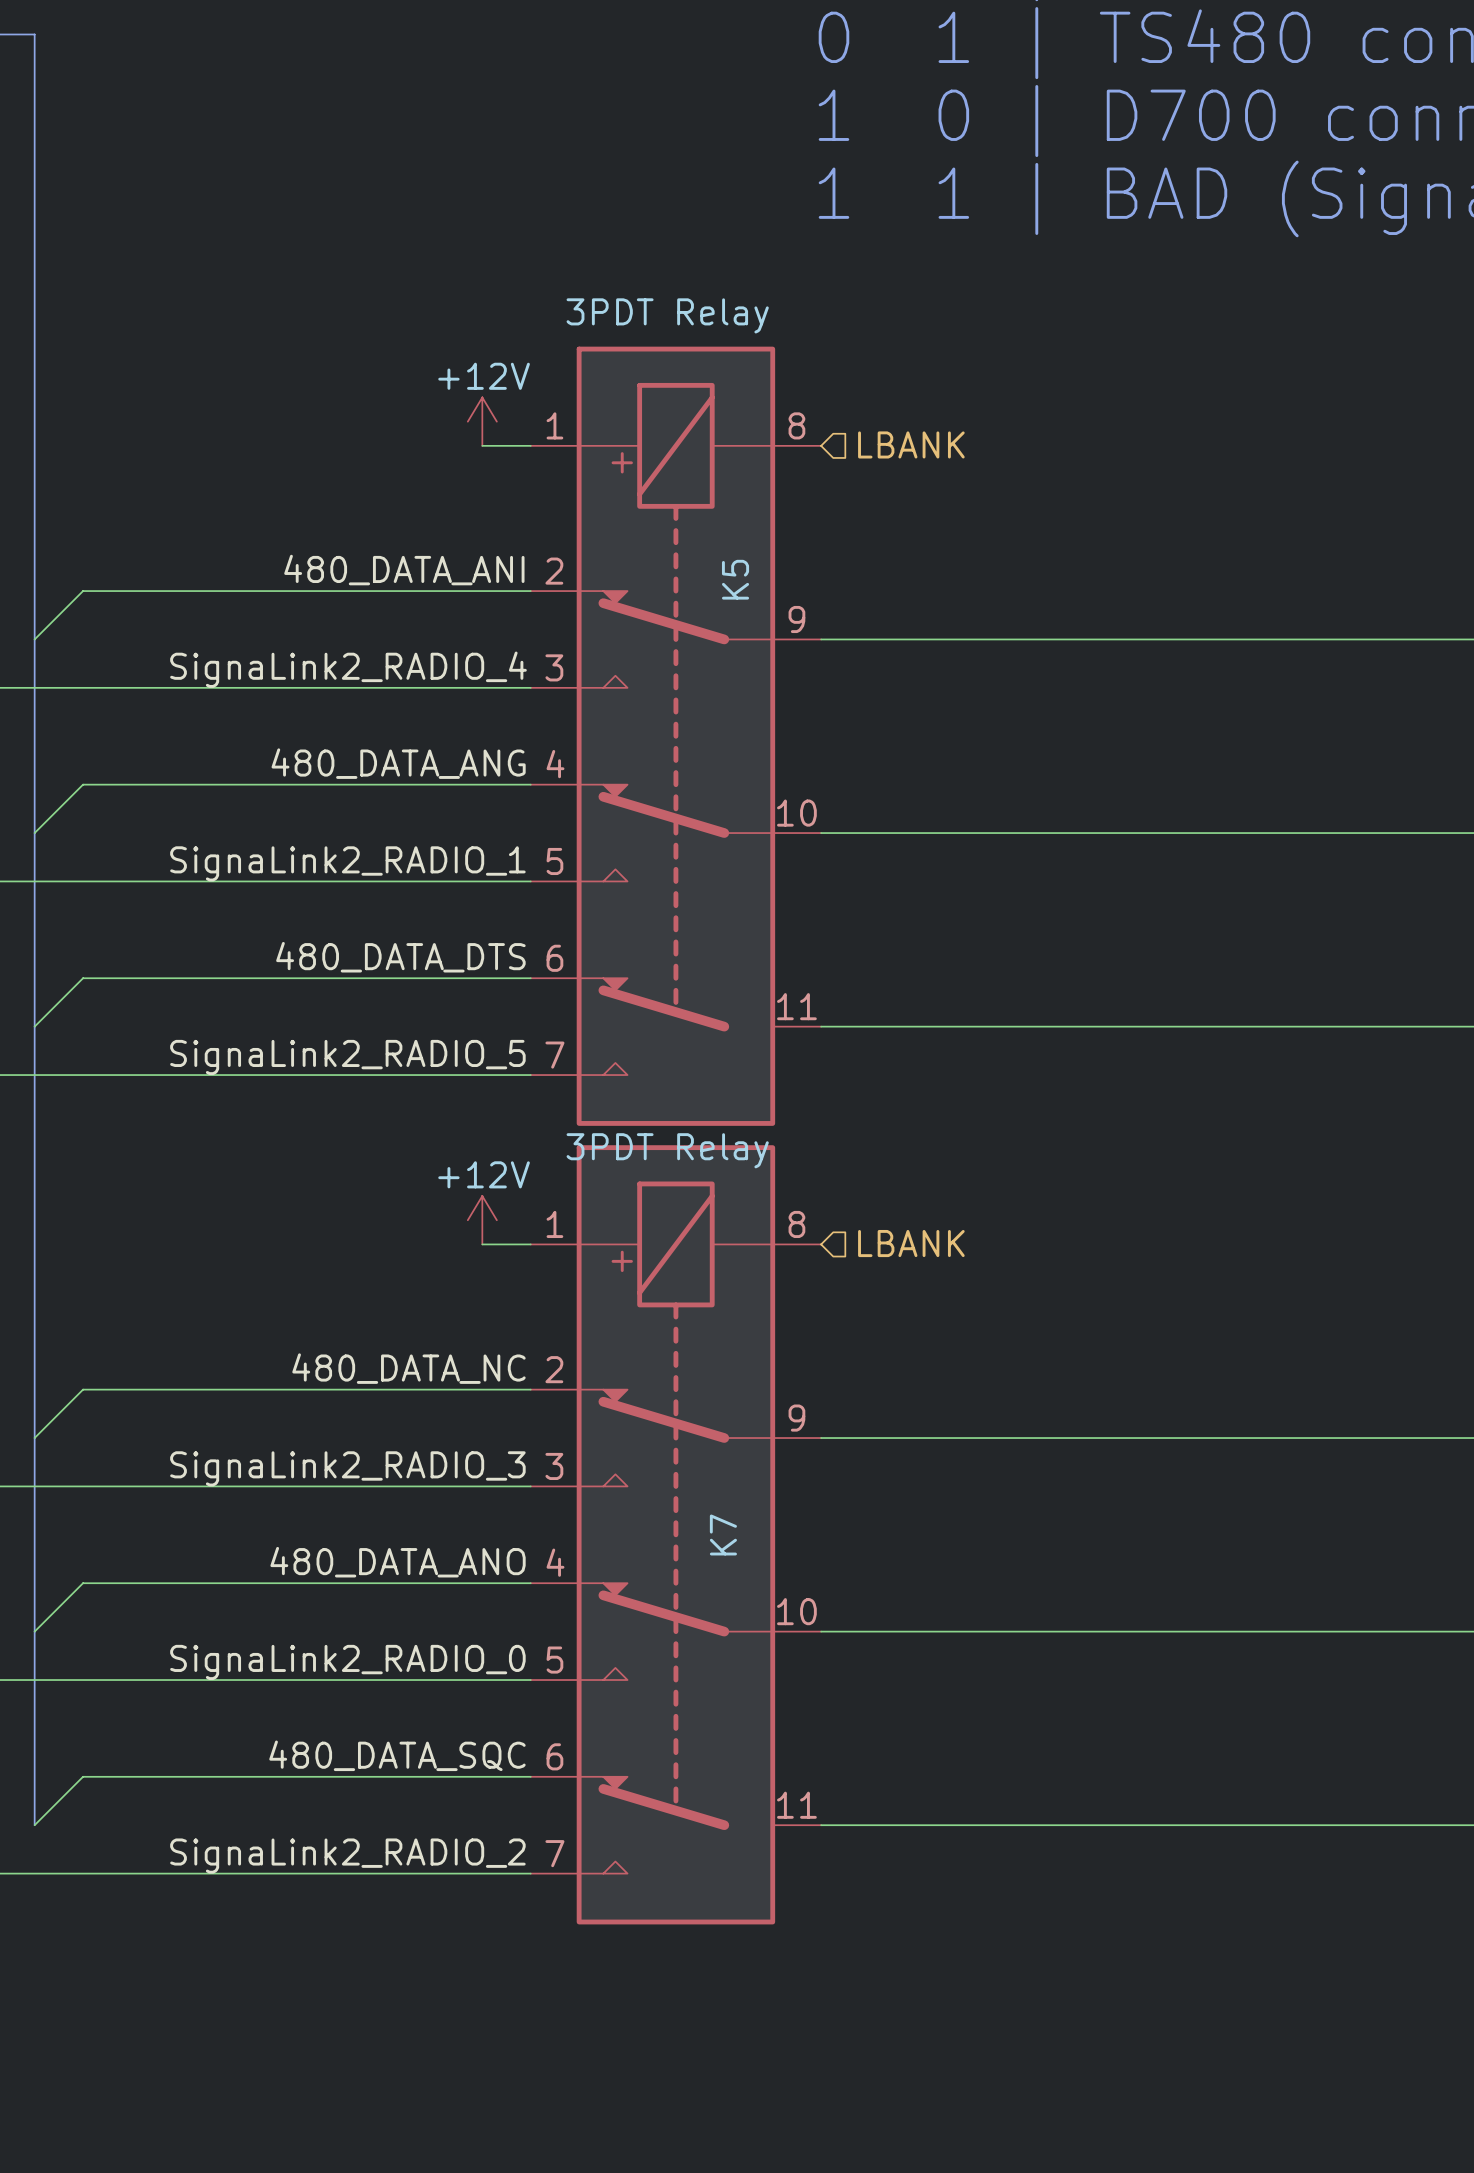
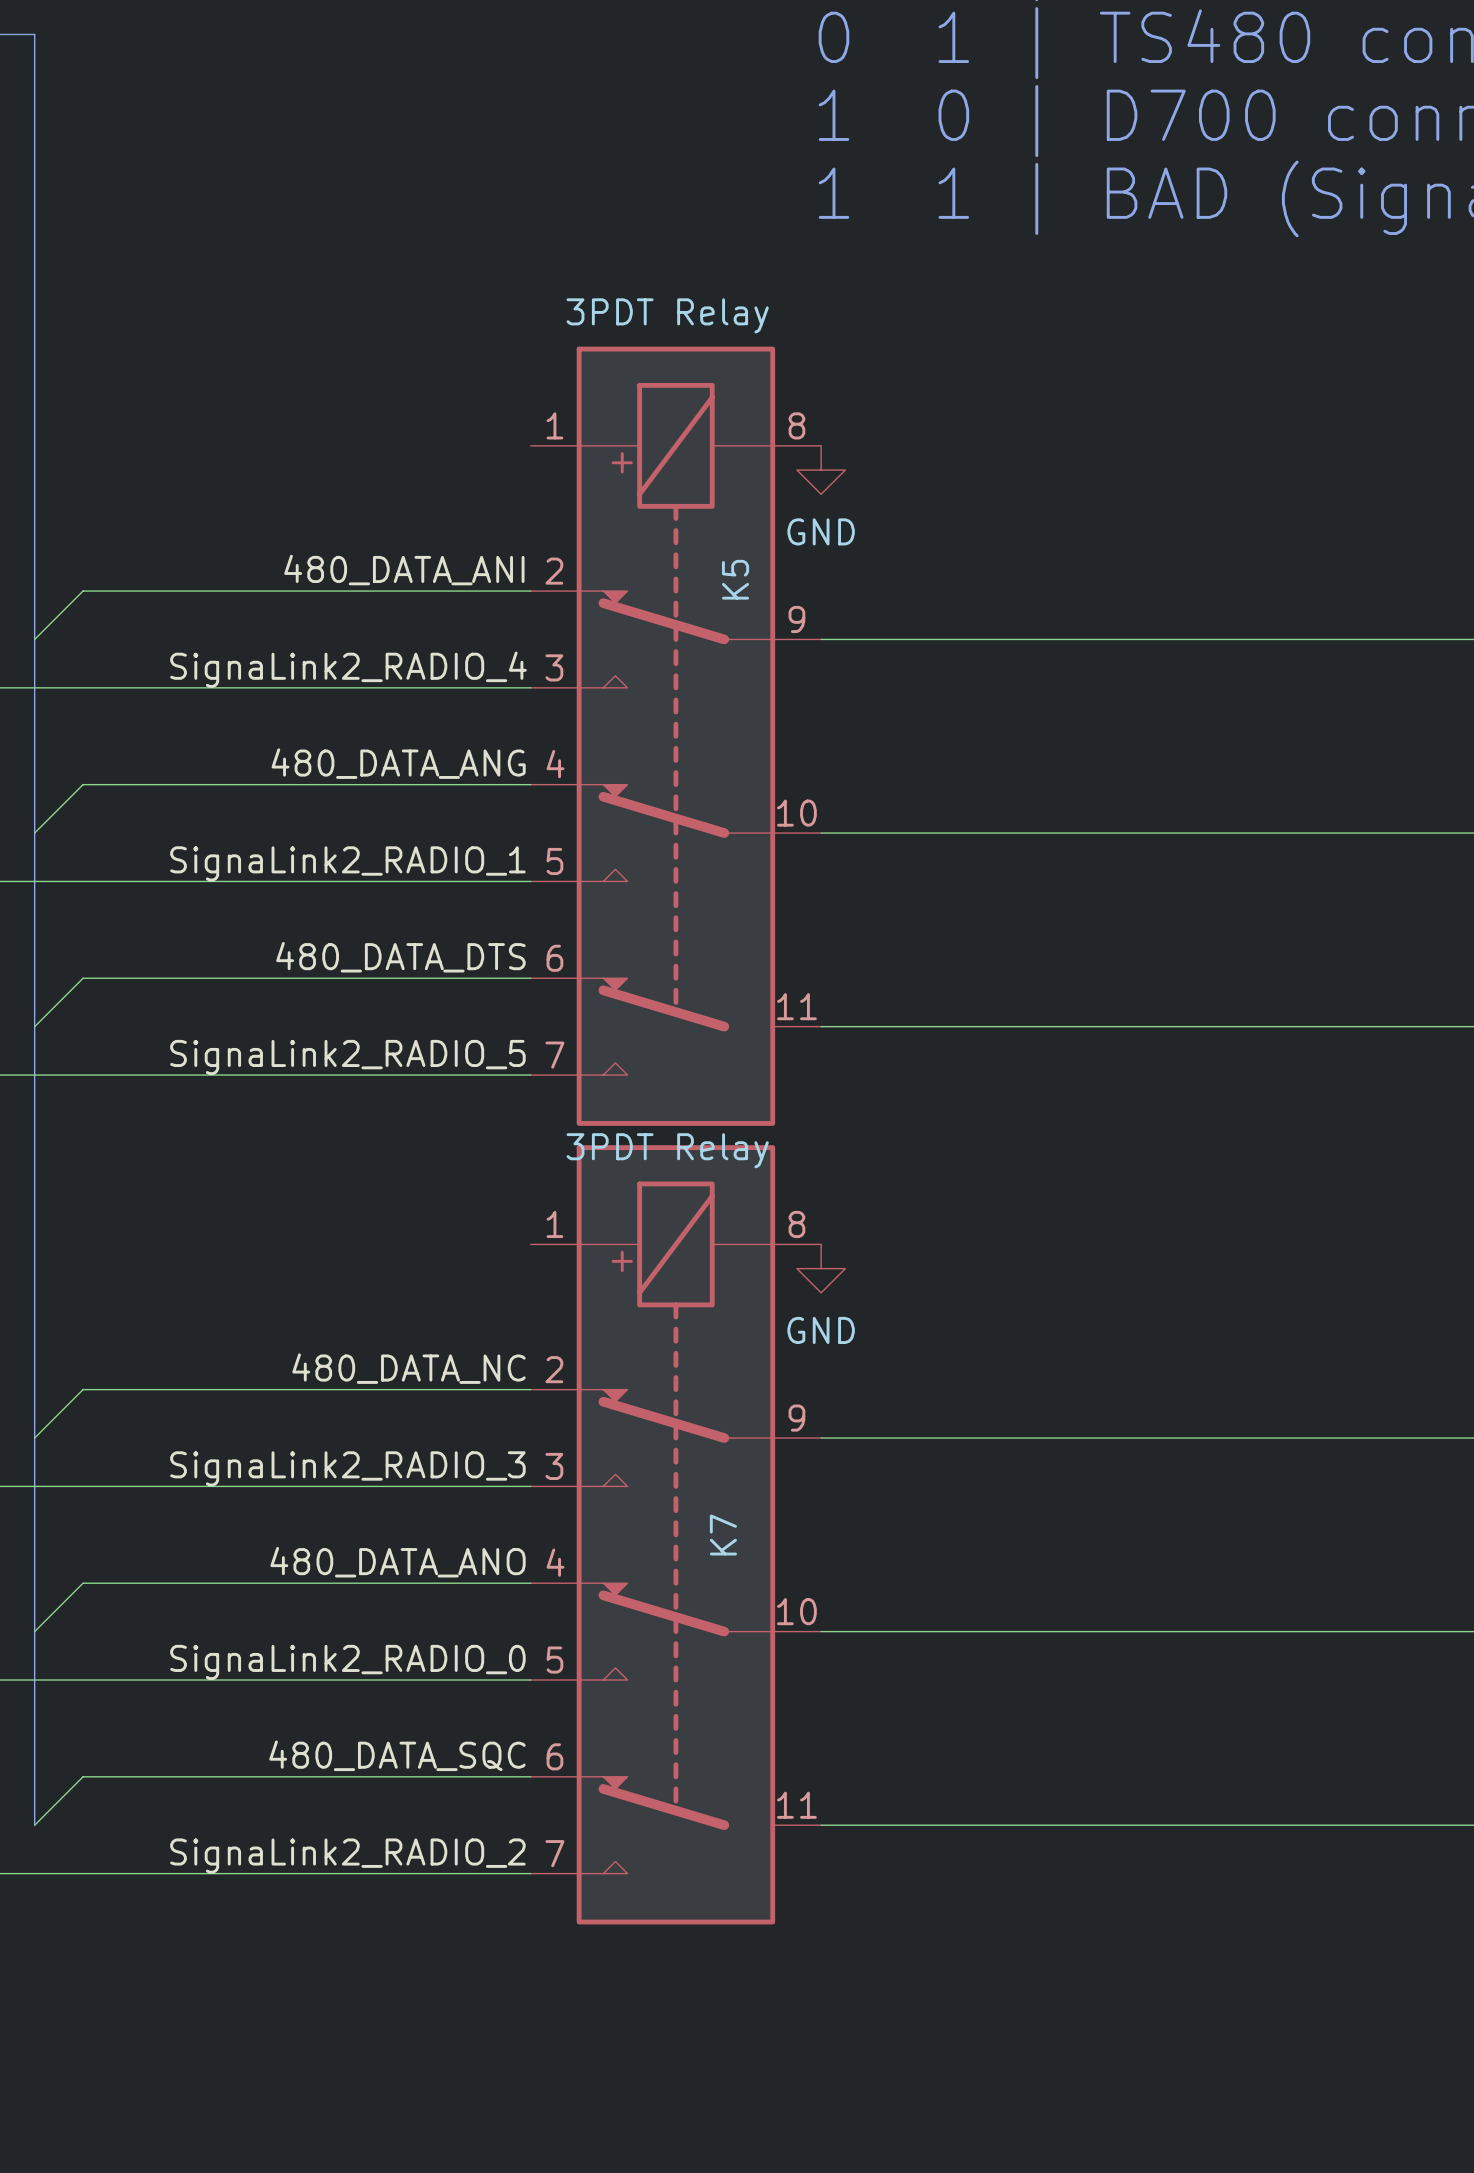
power symbol: +12V (482, 421) -> none
hierarchical label: LBANK (911, 444) -> none
wire: (482, 445) (530, 445) -> none
power symbol: none -> GND (821, 470)
power symbol: +12V (482, 1220) -> none
hierarchical label: LBANK (911, 1243) -> none
wire: (482, 1244) (530, 1244) -> none
power symbol: none -> GND (821, 1268)

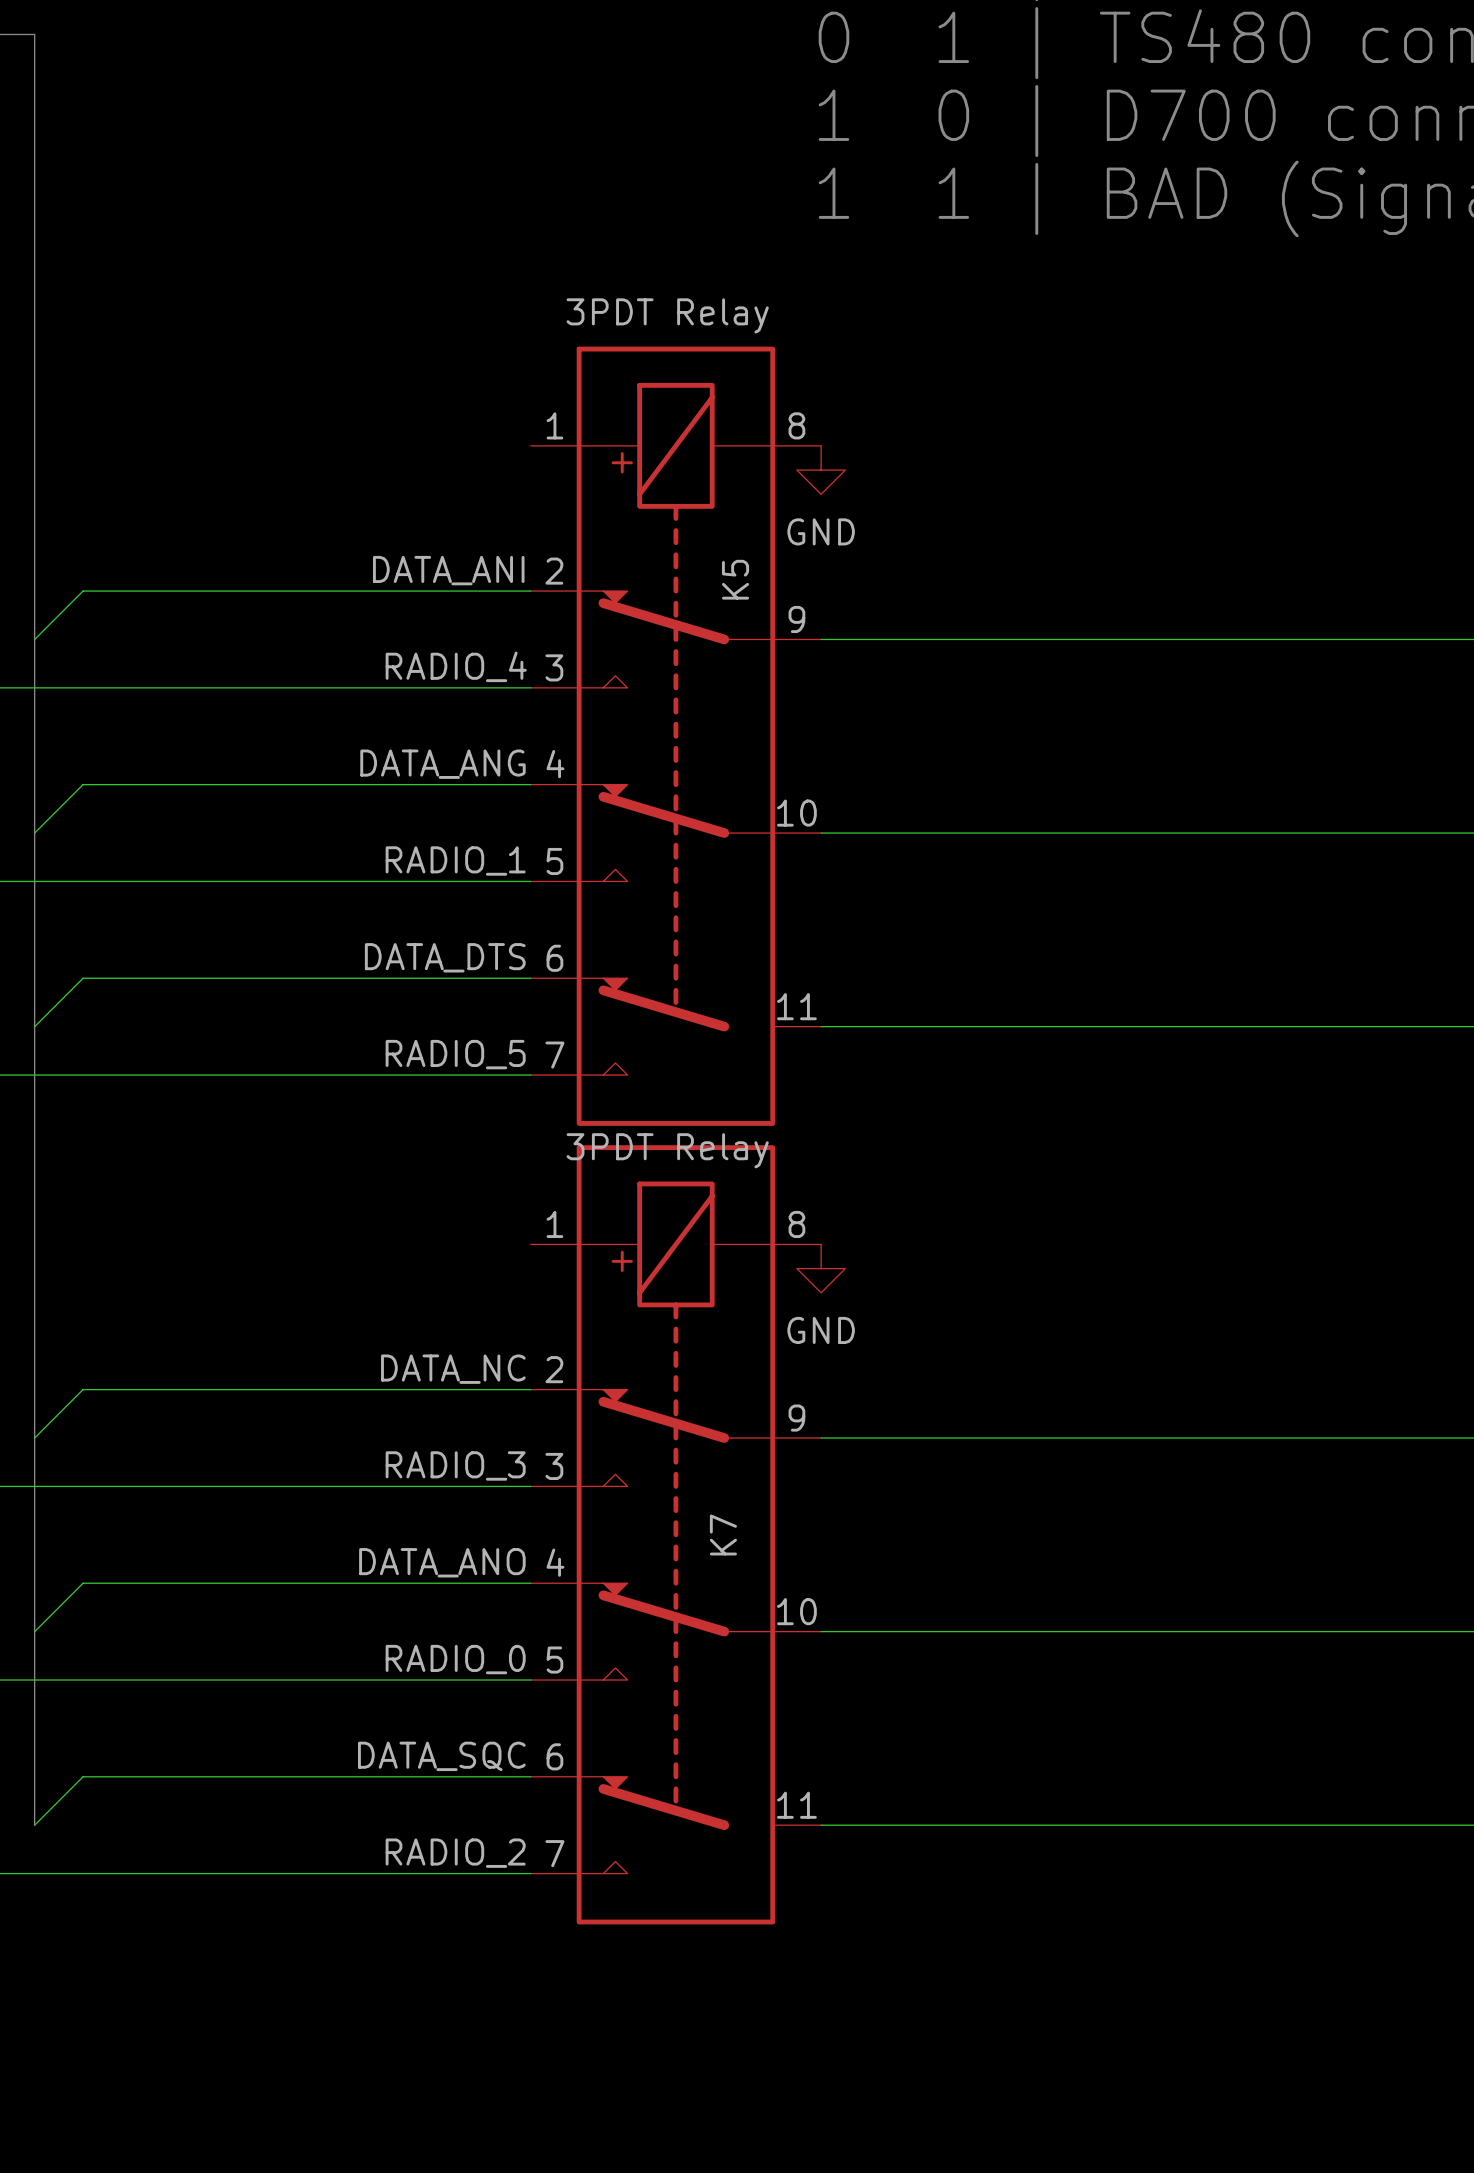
label: 480_DATA_ANI (404, 570) -> DATA_ANI (448, 570)
label: SignaLink2_RADIO_4 (348, 669) -> RADIO_4 (456, 666)
label: 480_DATA_ANG (398, 763) -> DATA_ANG (442, 764)
label: SignaLink2_RADIO_1 (347, 863) -> RADIO_1 (455, 861)
label: 480_DATA_DTS (400, 957) -> DATA_DTS (445, 957)
label: SignaLink2_RADIO_5 (347, 1057) -> RADIO_5 (455, 1054)
label: 480_DATA_NC (408, 1368) -> DATA_NC (453, 1369)
label: SignaLink2_RADIO_3 (347, 1468) -> RADIO_3 (455, 1465)
label: 480_DATA_ANO (398, 1562) -> DATA_ANO (442, 1562)
label: SignaLink2_RADIO_0 (347, 1662) -> RADIO_0 (455, 1659)
label: 480_DATA_SQC (397, 1755) -> DATA_SQC (441, 1756)
label: SignaLink2_RADIO_2 (347, 1856) -> RADIO_2 (455, 1853)

